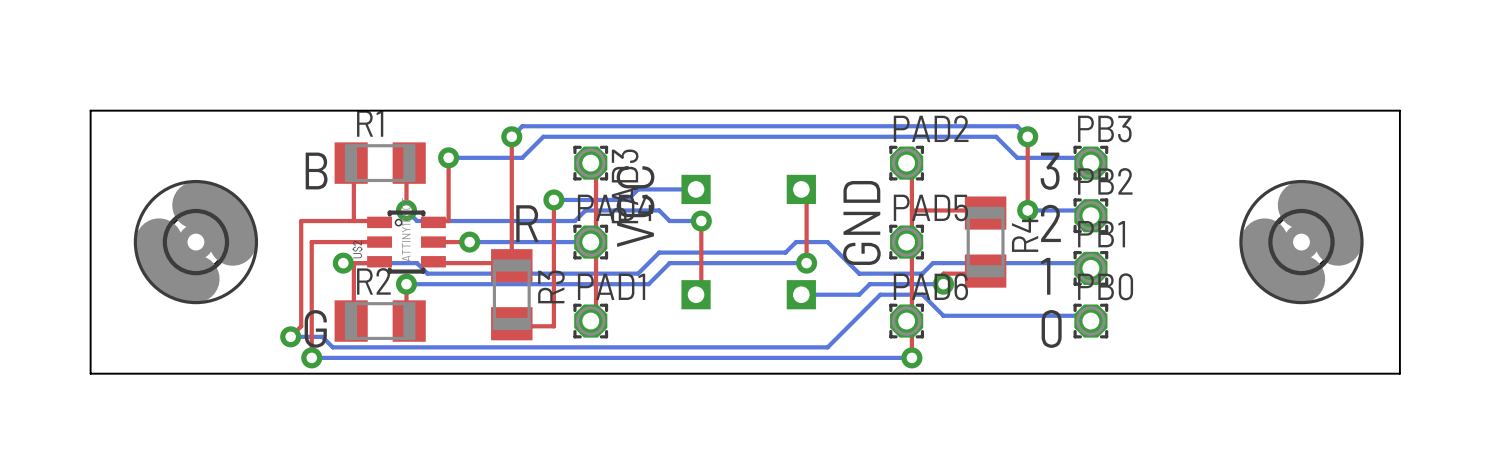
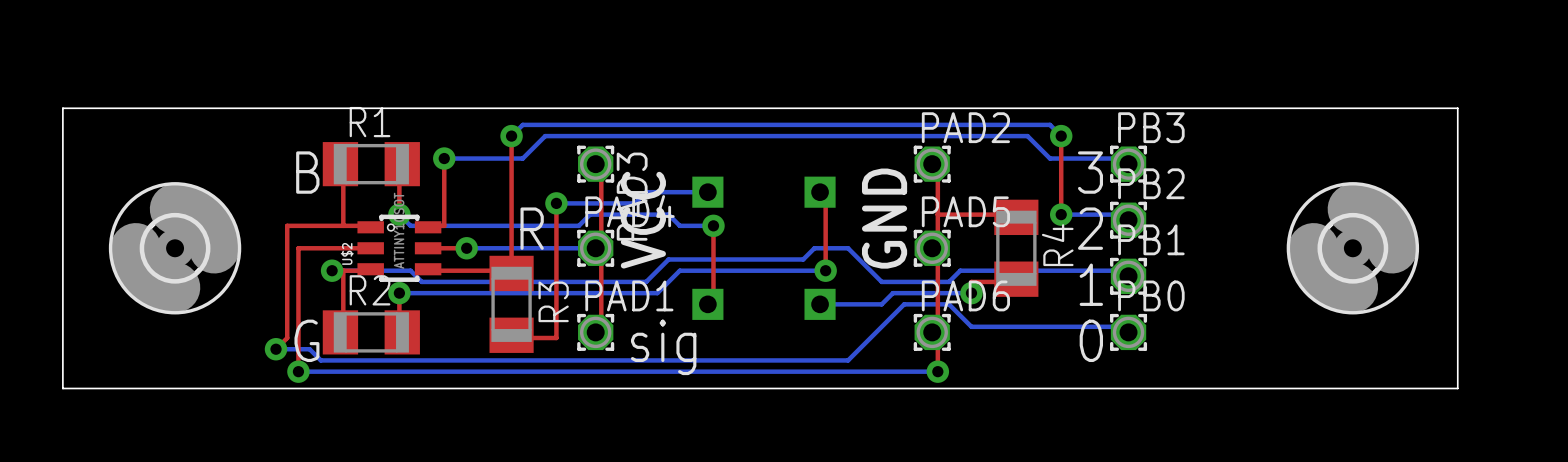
text: none -> sig (663, 347)

